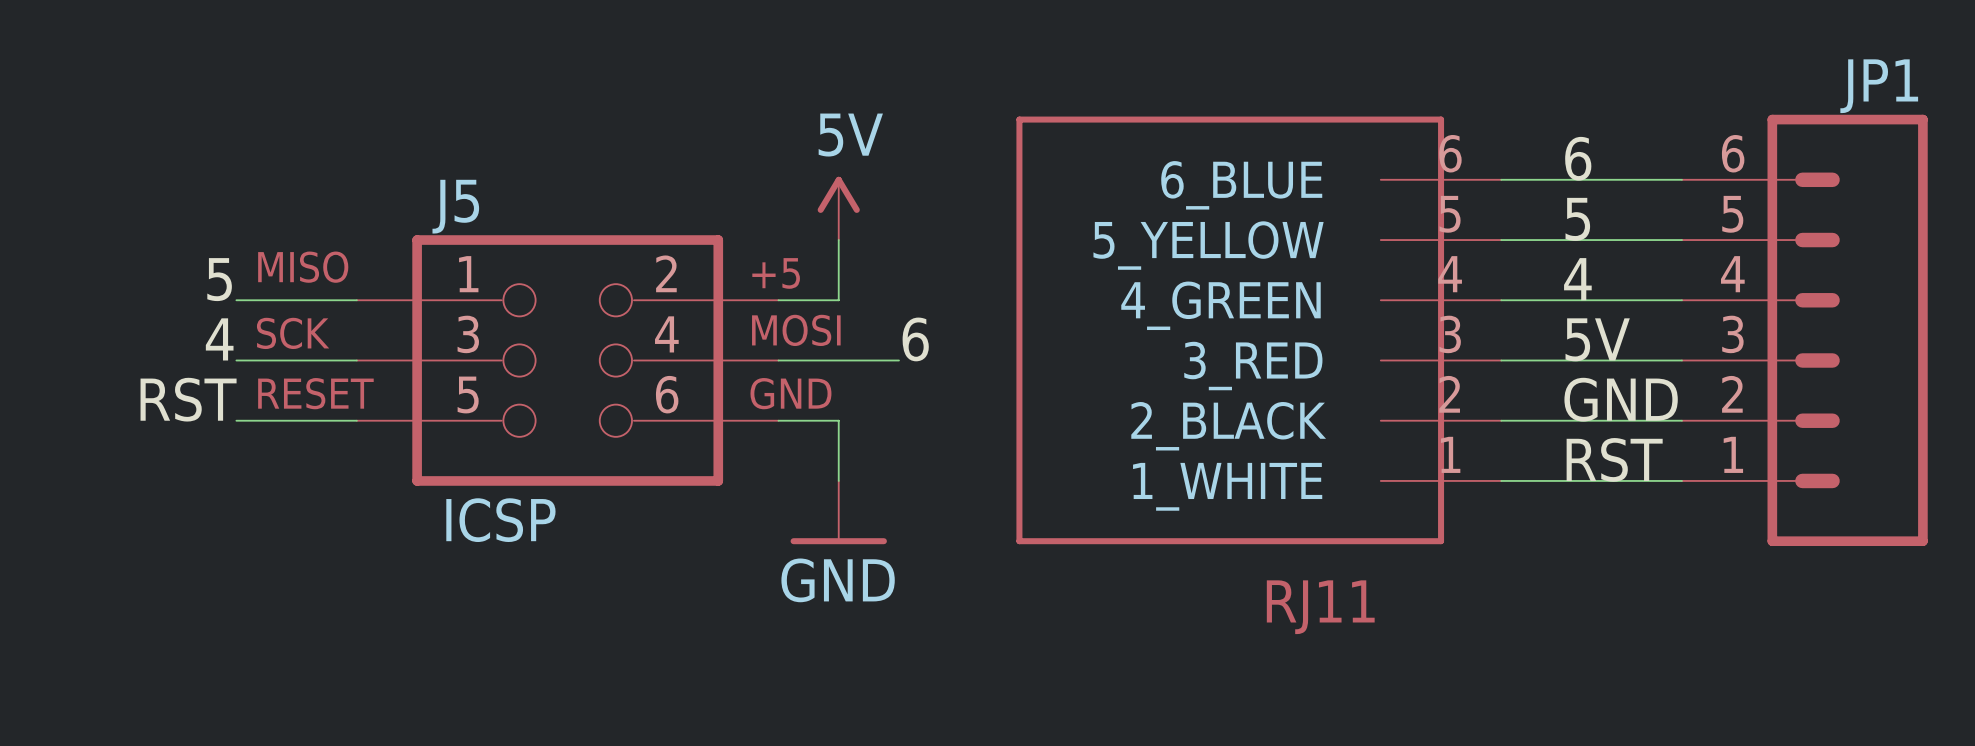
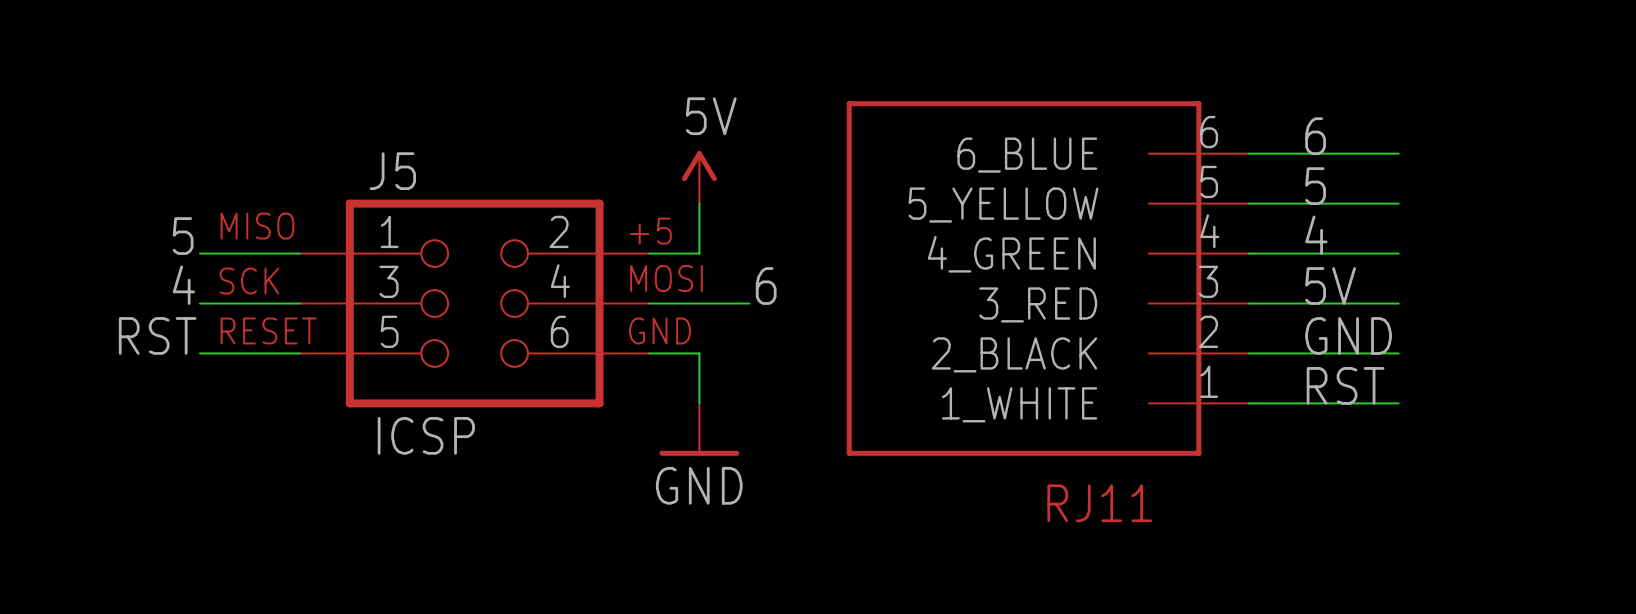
JP1: (1804, 330) -> none

